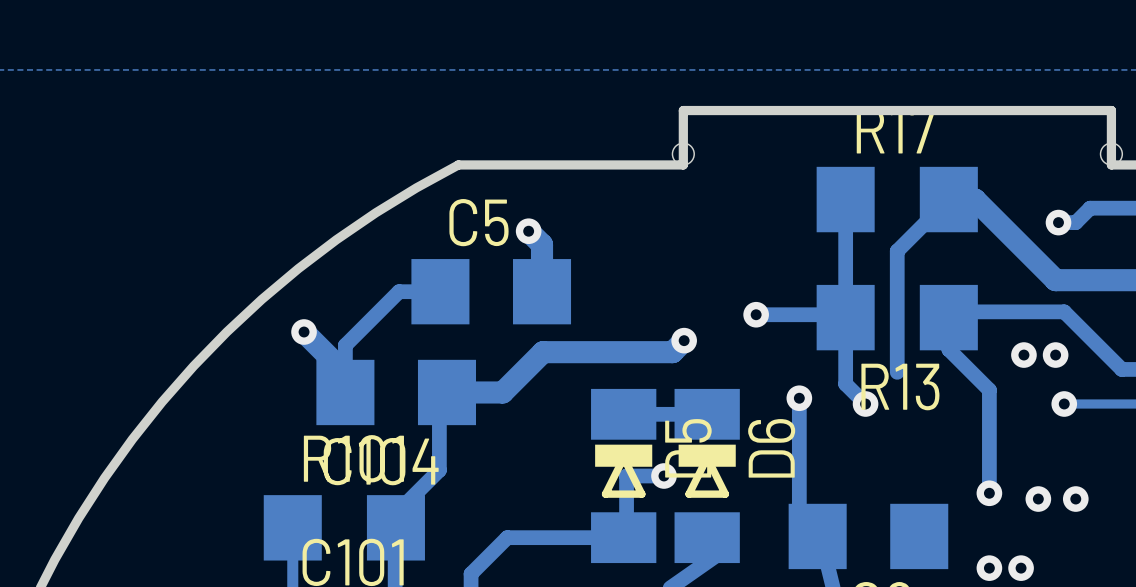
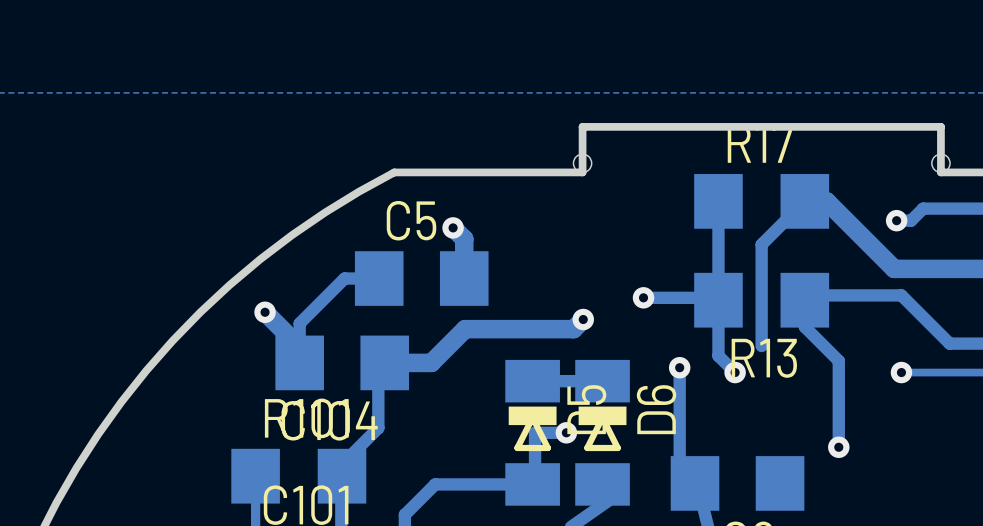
via: (1023, 355) -> none
via: (1055, 355) -> none
via: (1038, 499) -> none
via: (1075, 499) -> none
via: (989, 568) -> none
via: (1021, 568) -> none

